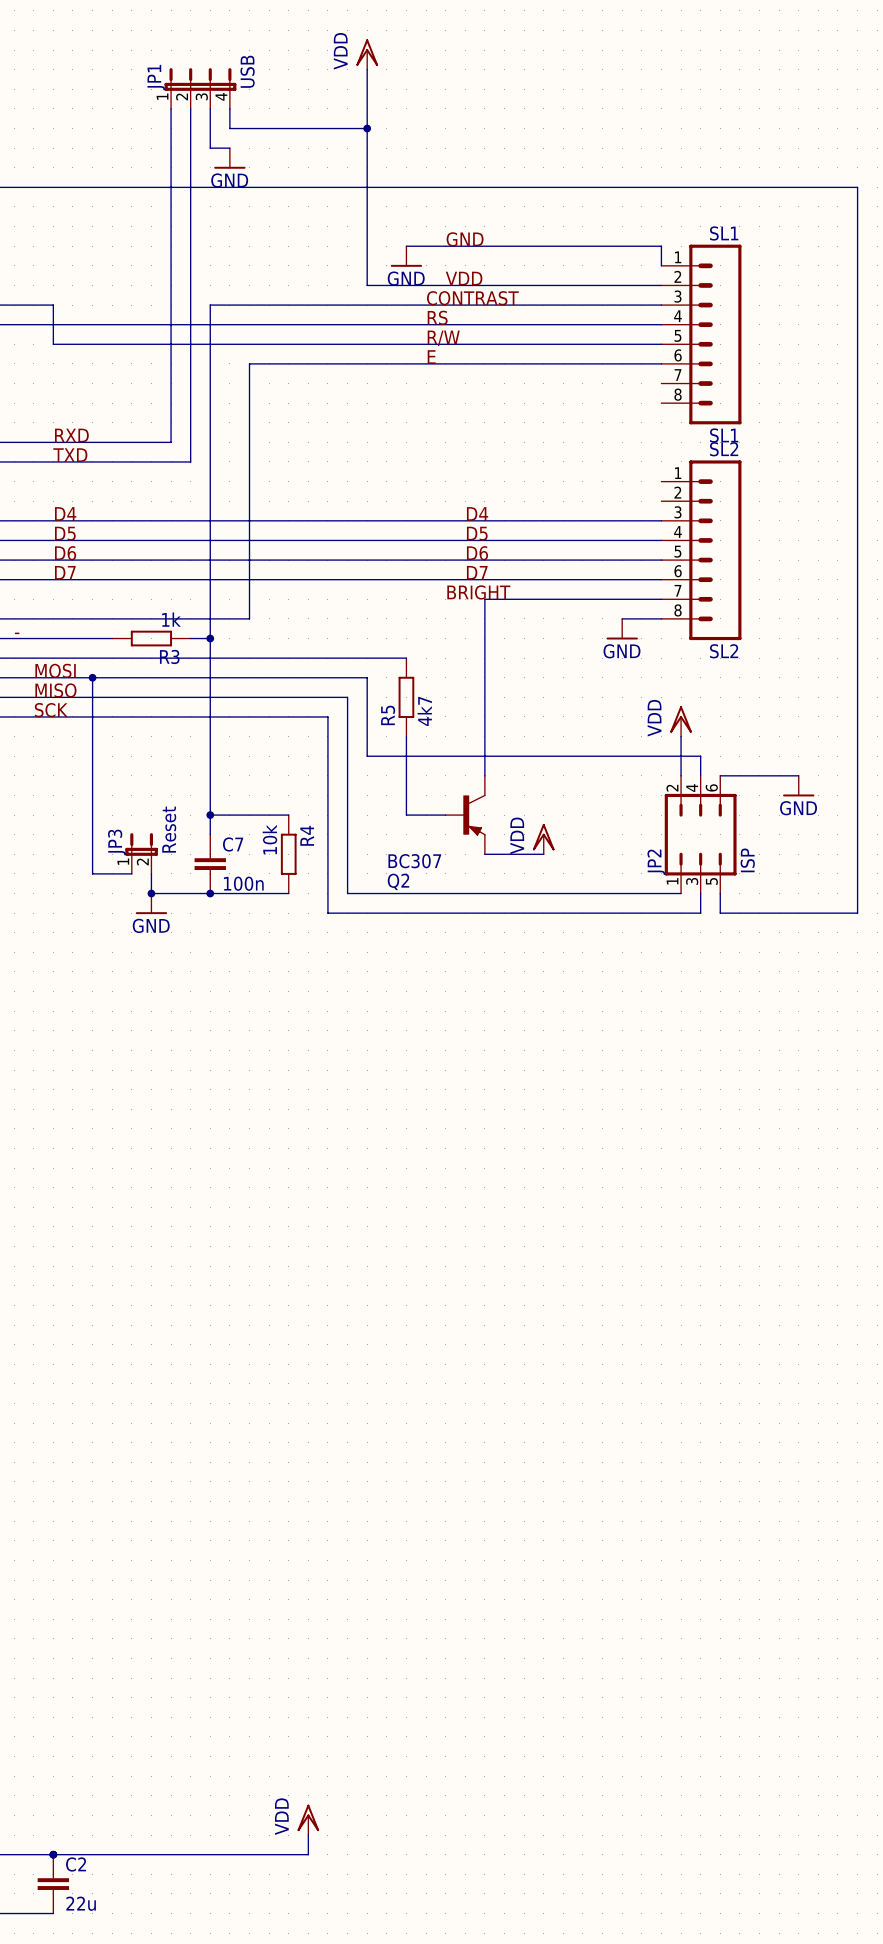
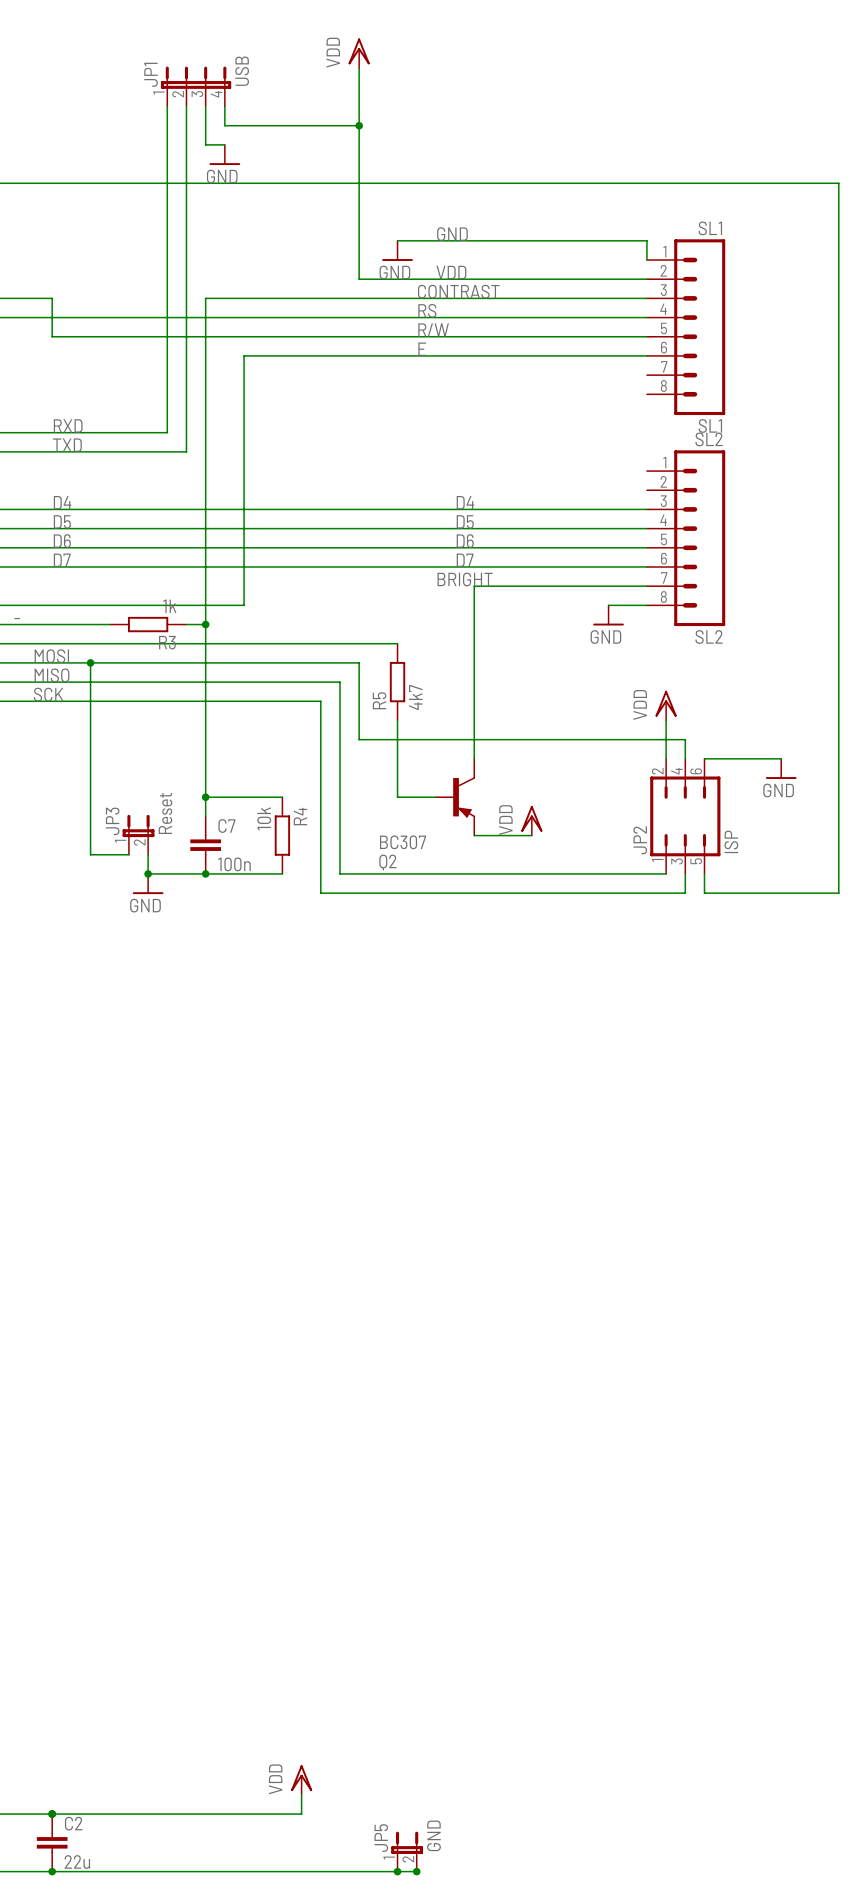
JP5: none -> GND (407, 1851)
wire: none -> (52, 1871) (416, 1871)
junction: none -> (52, 1871)
junction: none -> (397, 1871)
junction: none -> (416, 1871)

